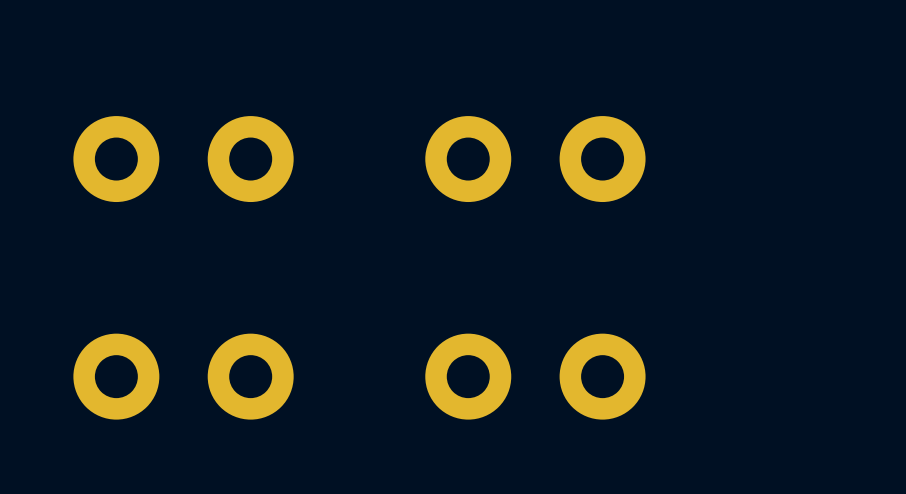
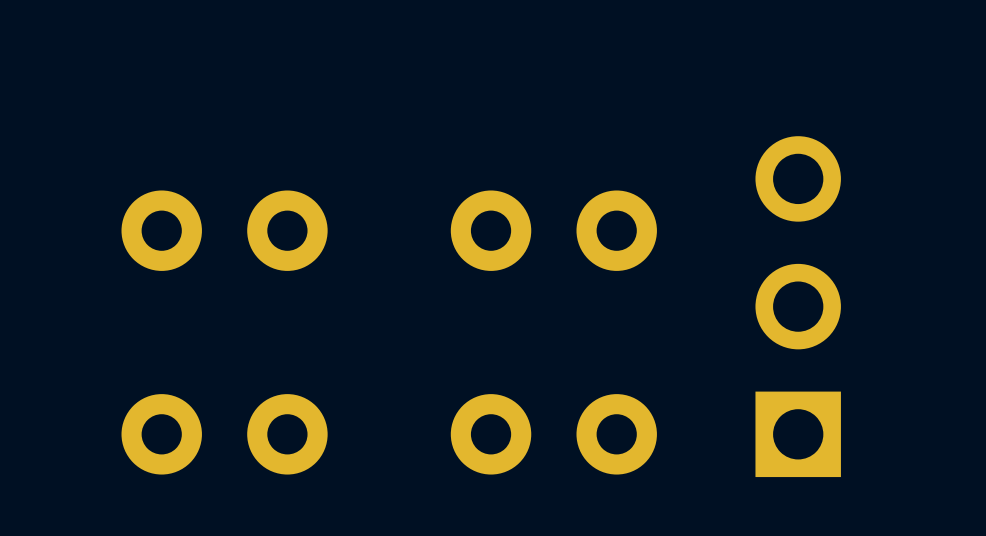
part: none -> (798, 306)

